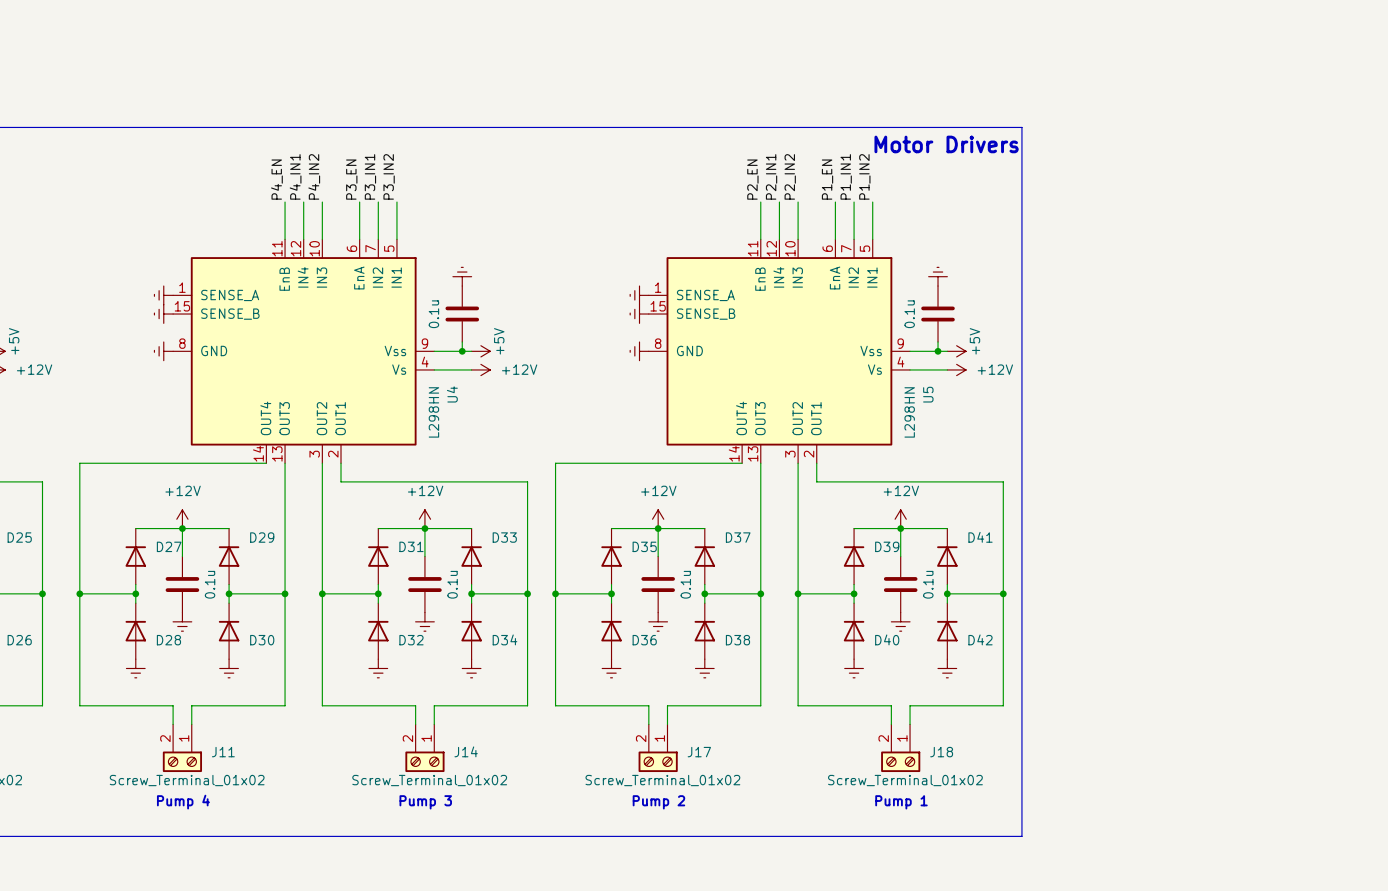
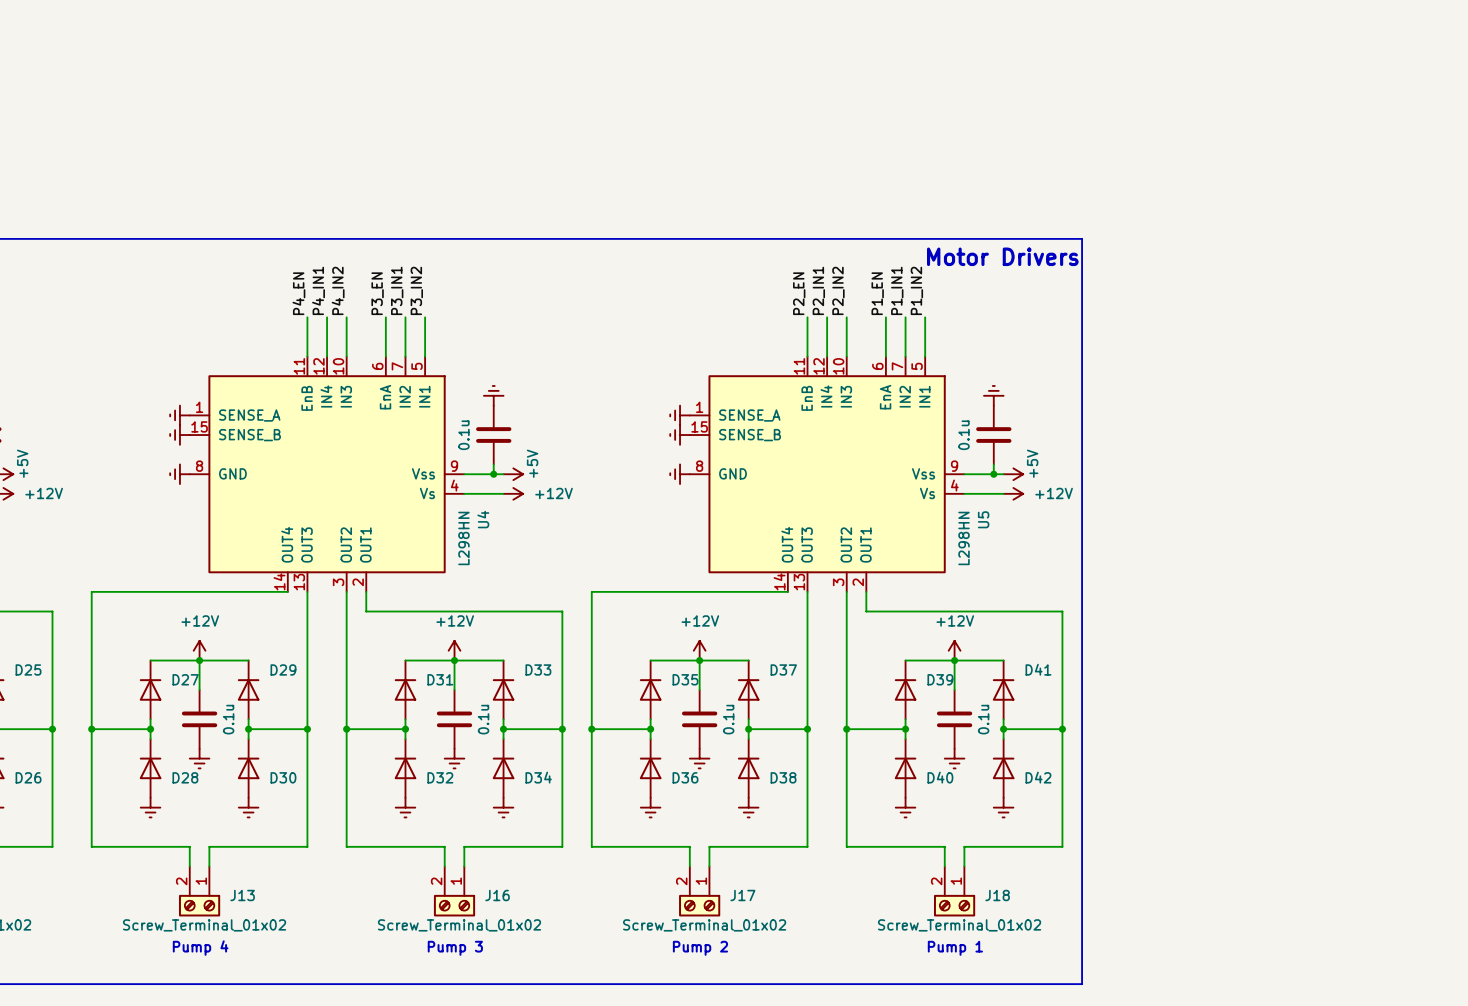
J14 name: J14 (466, 751) -> J16 (497, 895)
J11 name: J11 (223, 752) -> J13 (242, 895)

